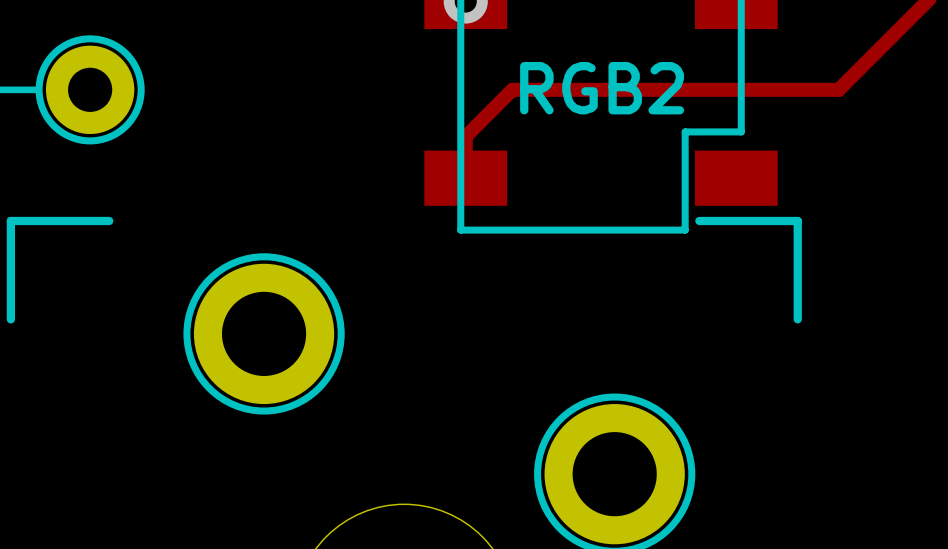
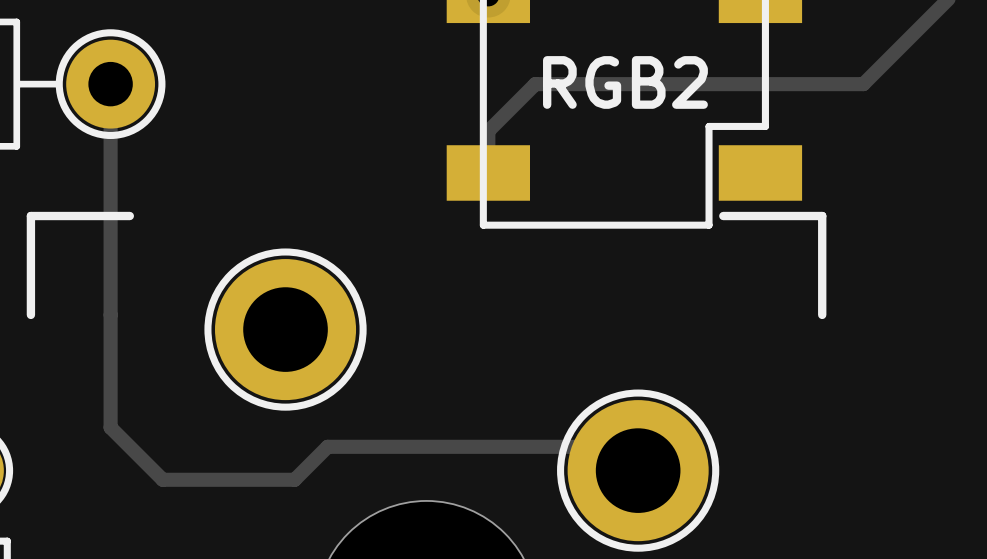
track: none -> (110, 84) (110, 427) (162, 479) (294, 479) (327, 446) (591, 446)

